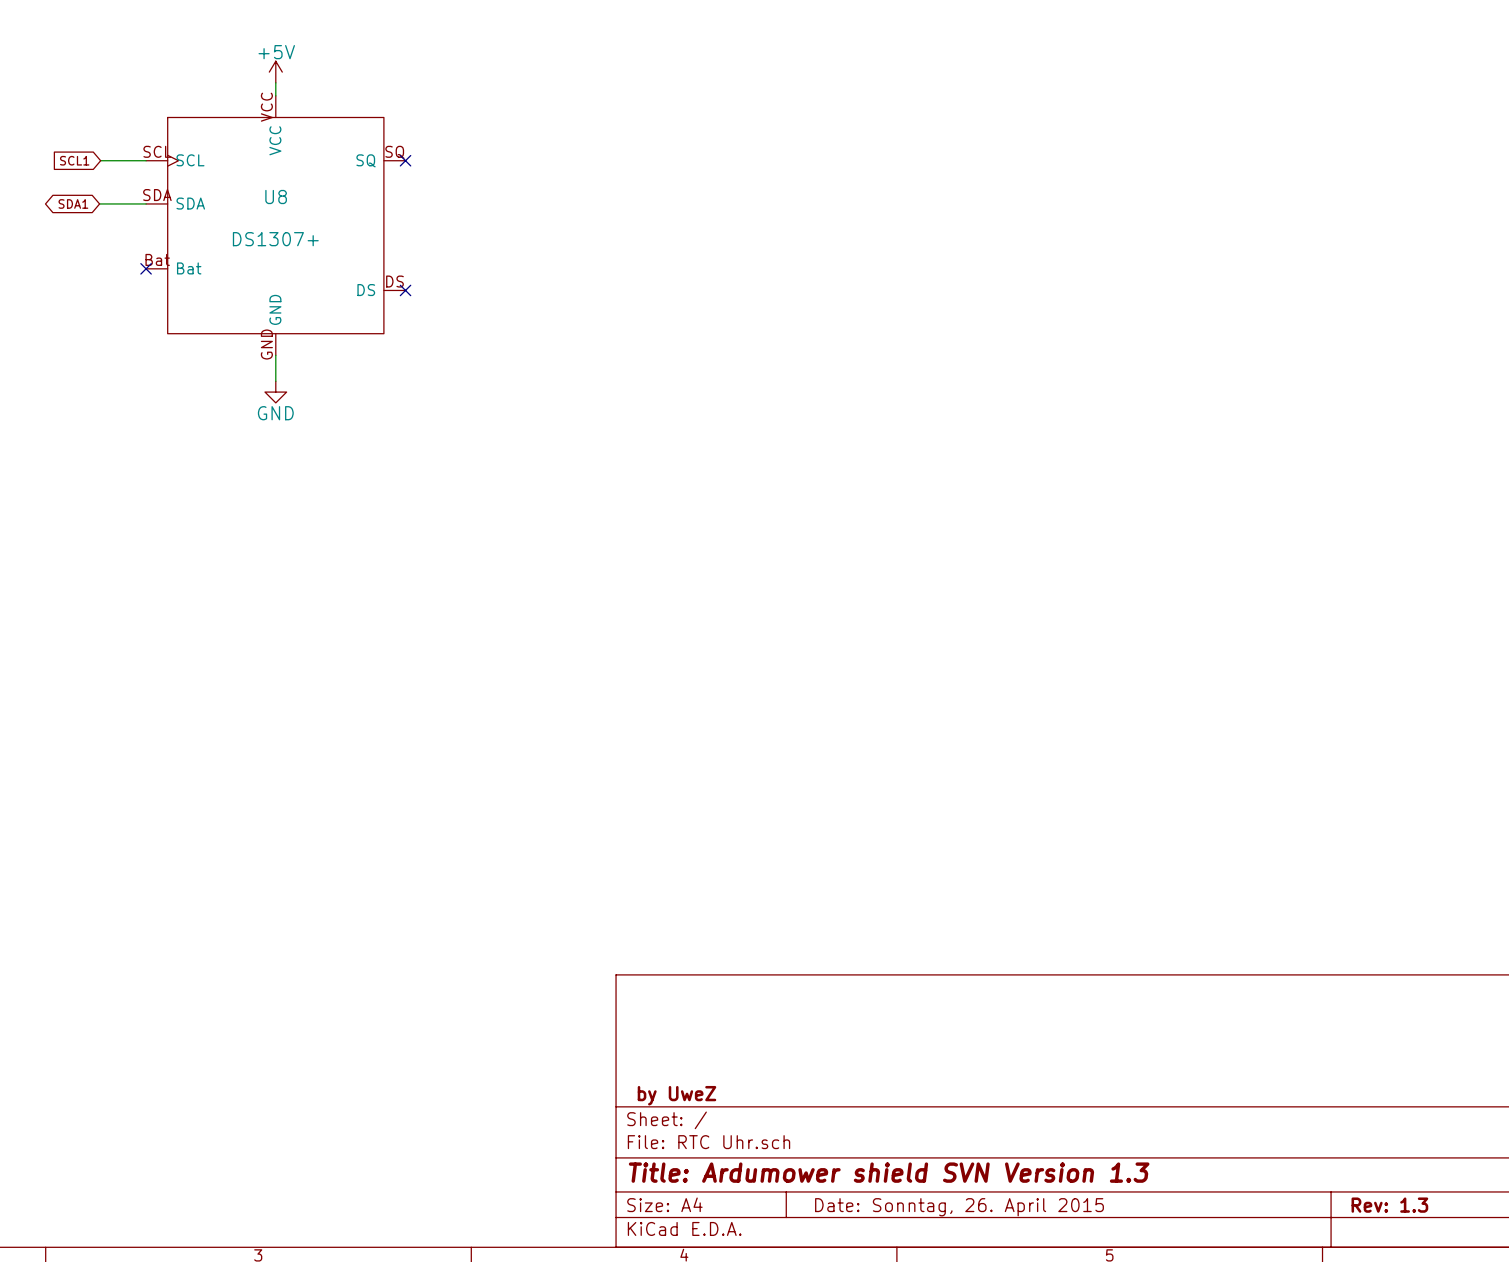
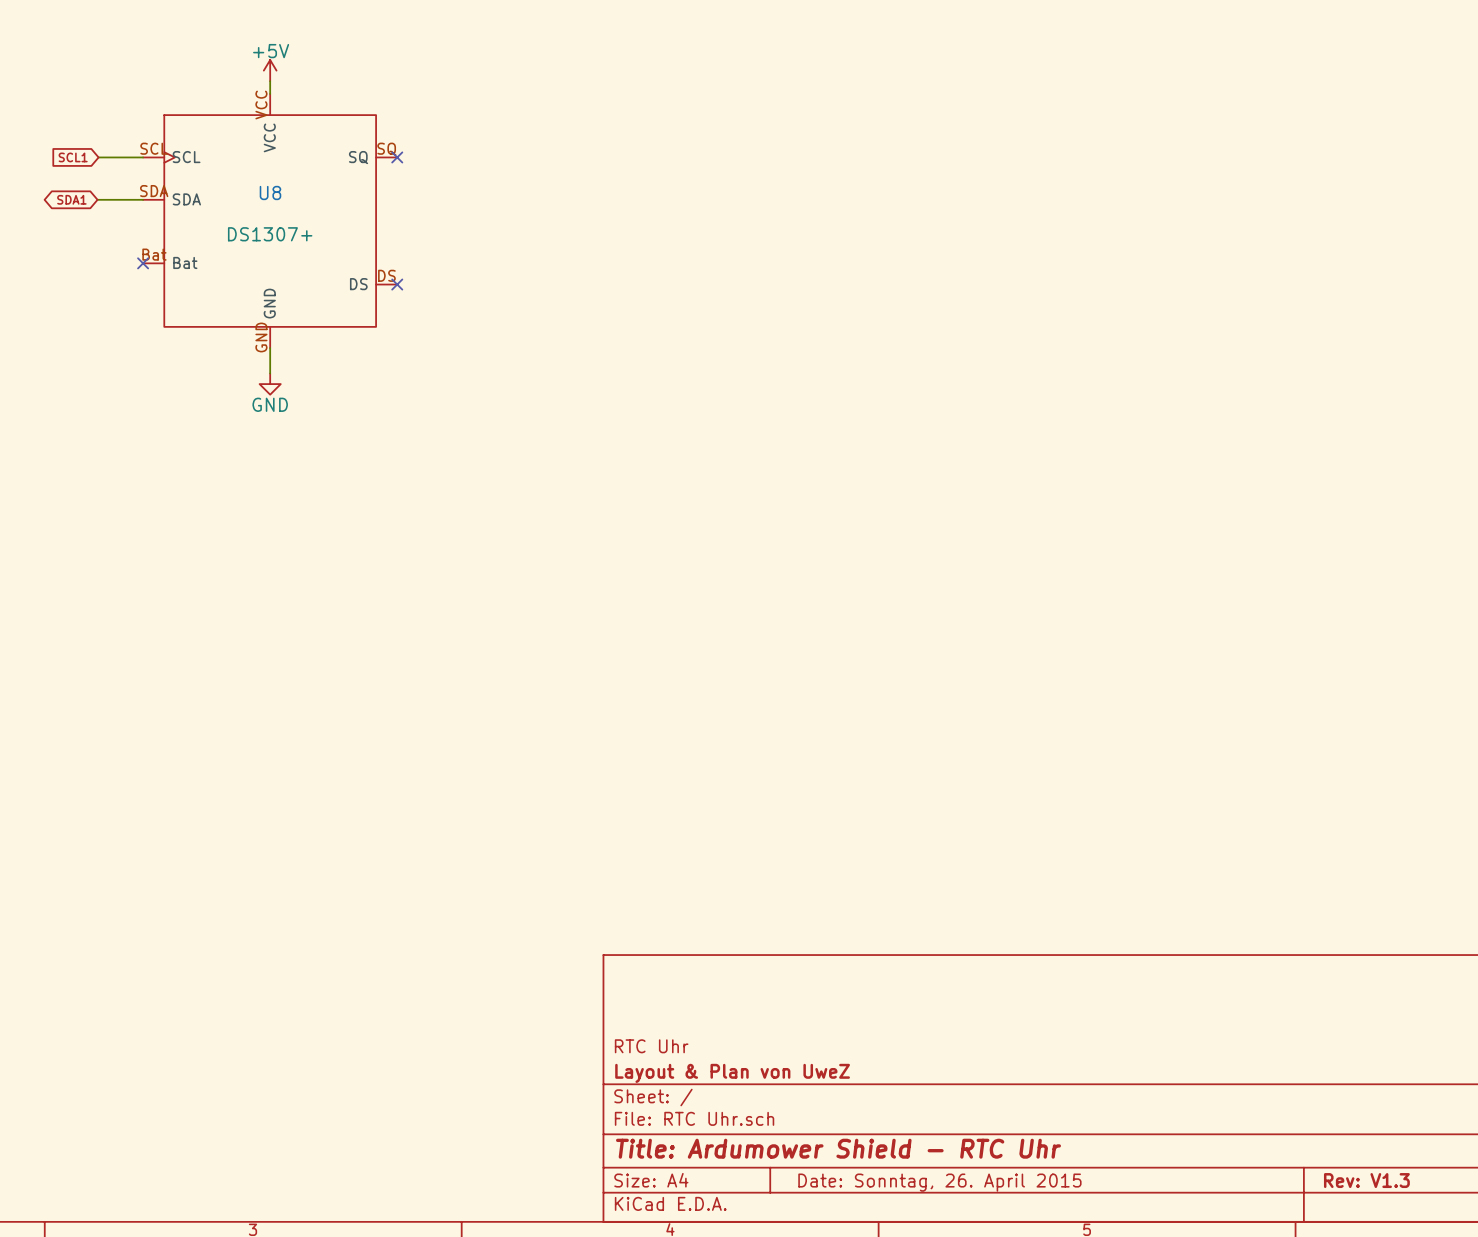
title block: none -> RTC Uhr (651, 1046)
title block: by UweZ (676, 1095) -> Layout & Plan von UweZ (732, 1073)
title block: Title: Ardumower shield SVN Version 1.3 (889, 1172) -> Title: Ardumower Shield - RTC Uhr (838, 1148)
title block: Rev: 1.3 (1389, 1205) -> Rev: V1.3 (1366, 1180)

